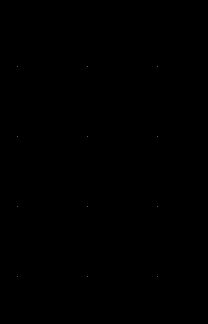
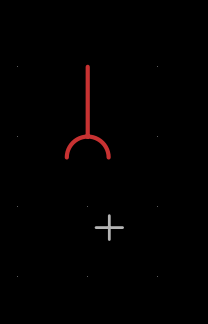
part: none -> + (87, 112)

